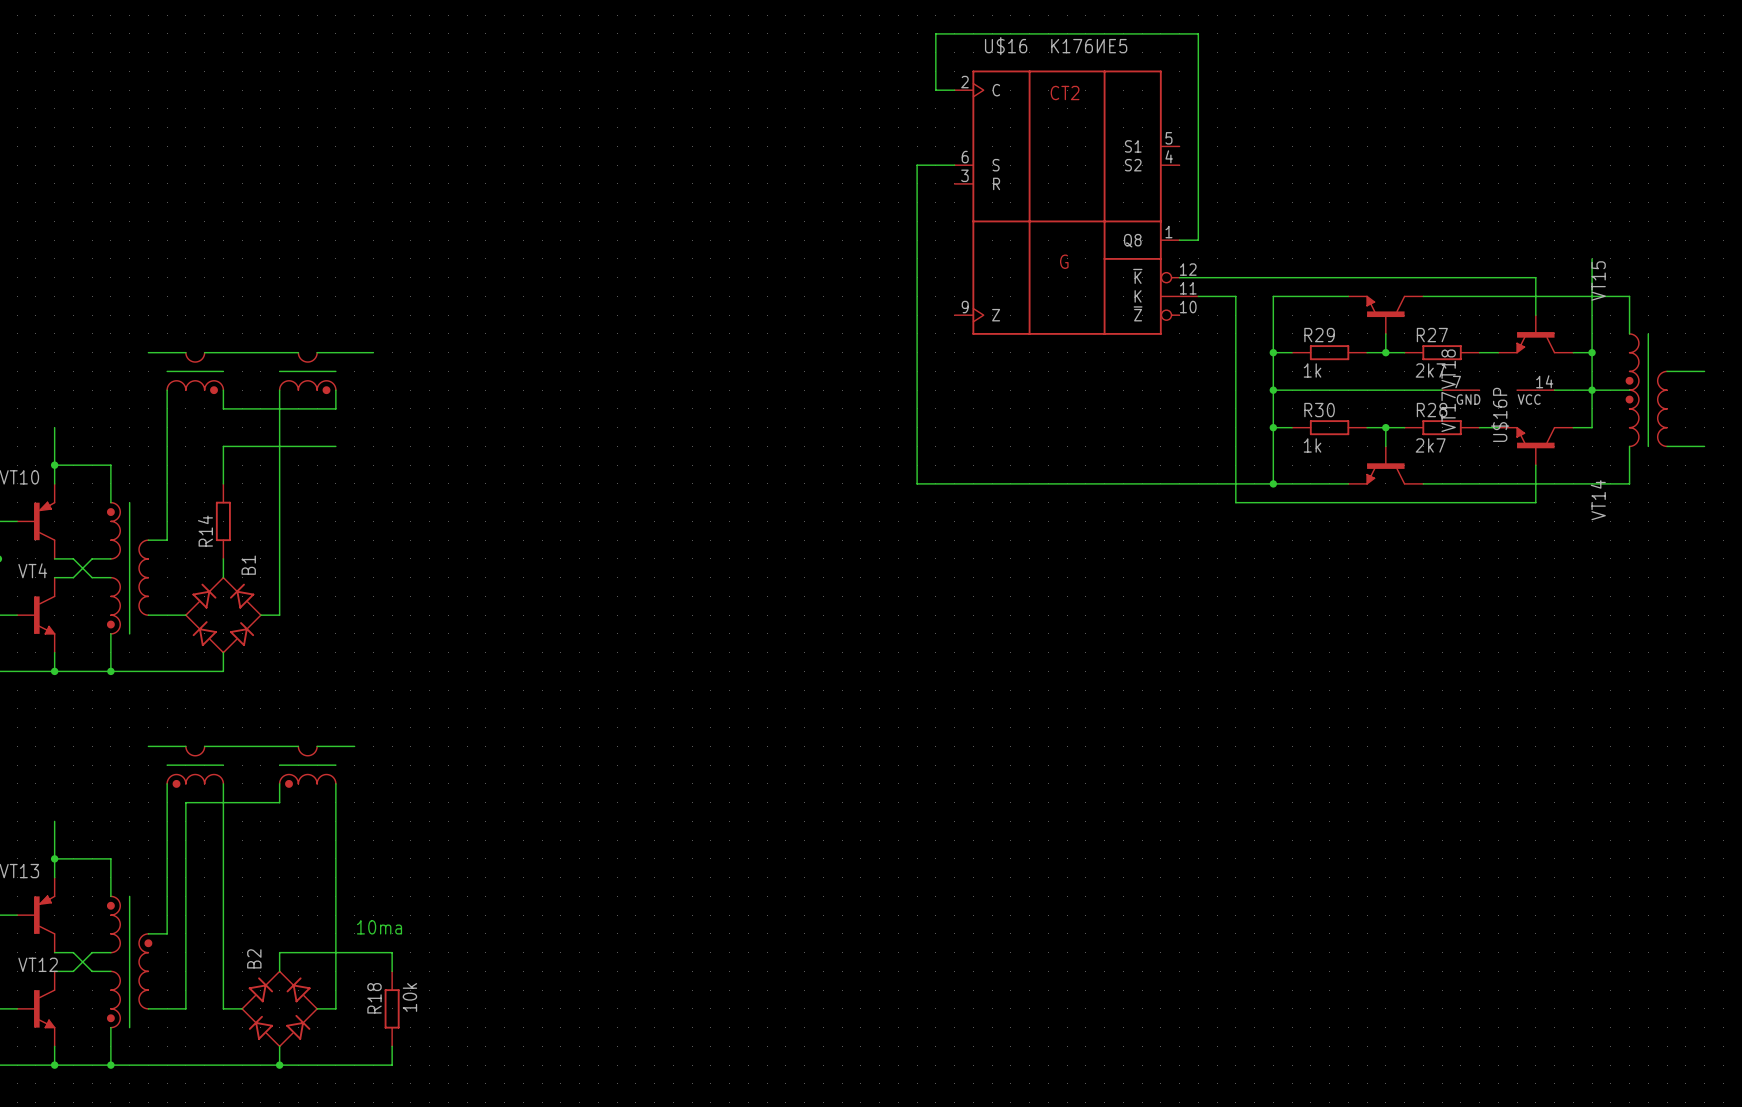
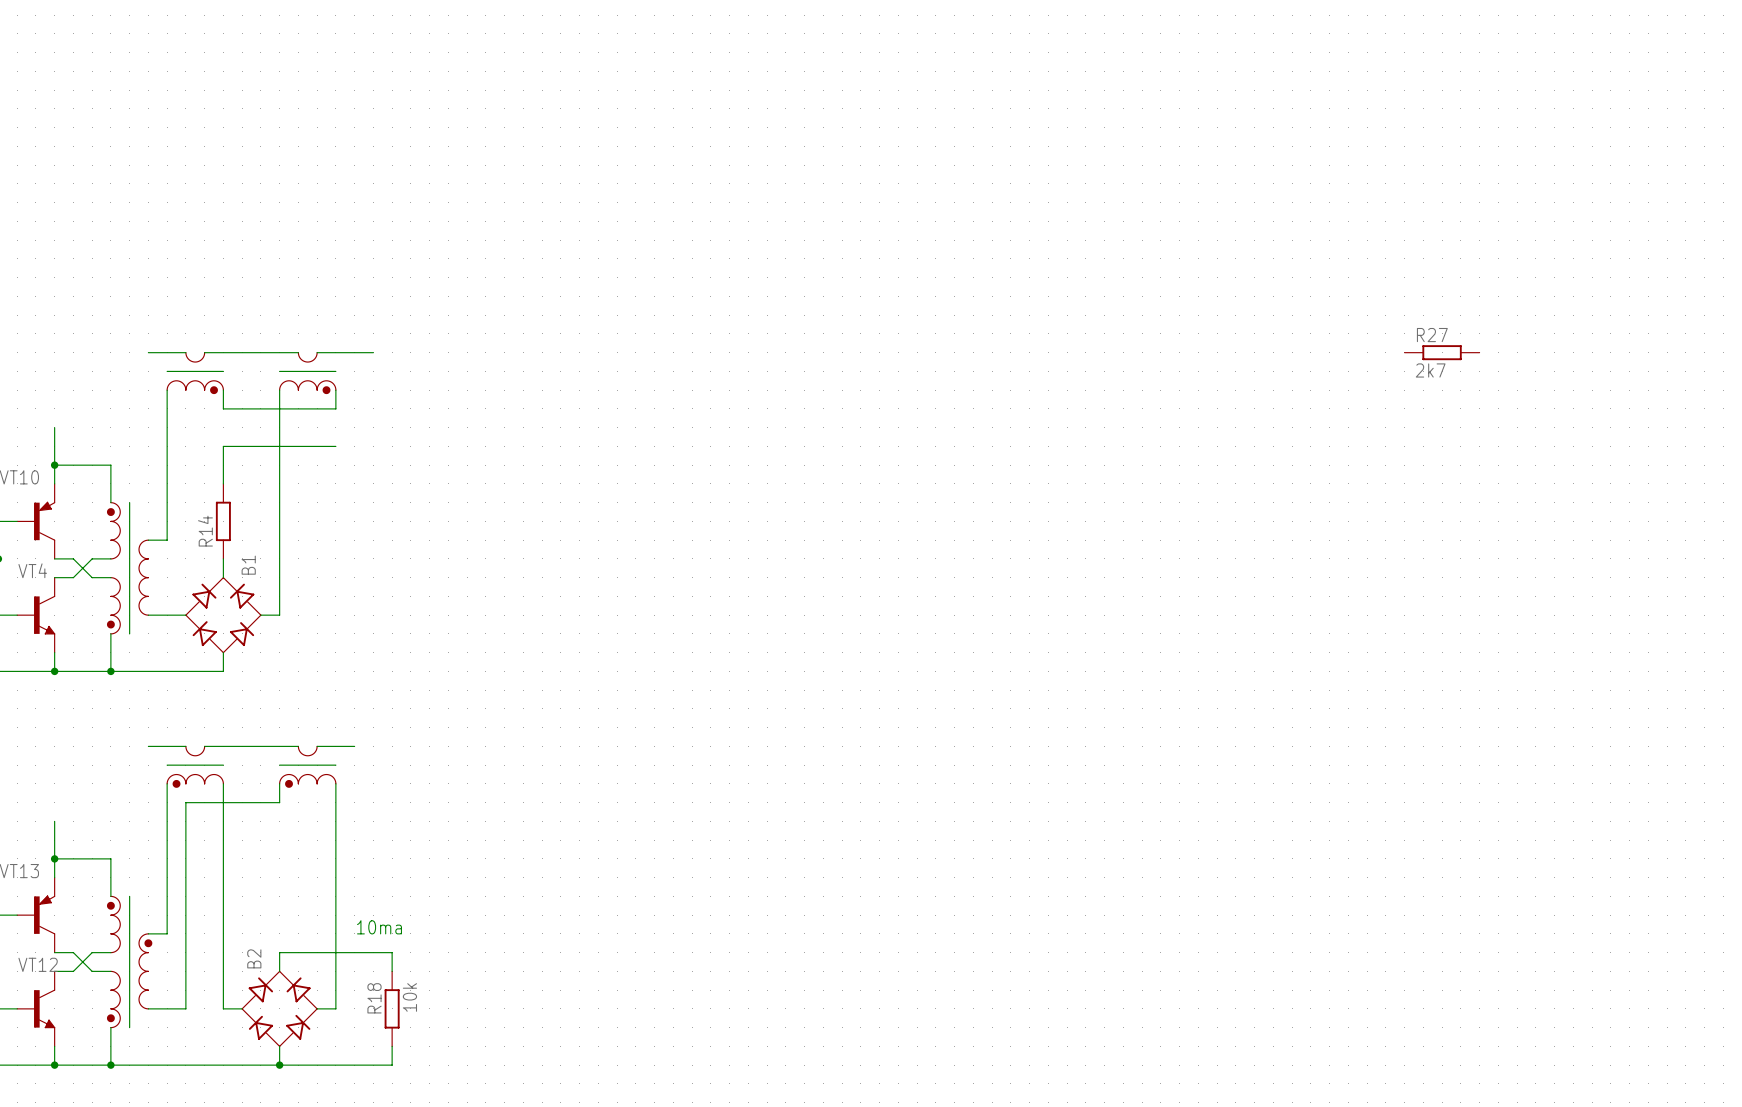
wire: (954, 90) (935, 90) (935, 33) (1198, 33) (1198, 240) (1179, 240) -> none
wire: (954, 165) (917, 165) (917, 483) (1348, 483) -> none
U$16: К176ИЕ5 (1076, 202) -> none
wire: (1592, 258) (1592, 427) (1573, 427) -> none
wire: (1179, 277) (1535, 277) (1535, 315) -> none
wire: (1198, 296) (1235, 296) (1235, 502) (1535, 502) (1535, 465) -> none
wire: (1348, 296) (1273, 296) (1273, 483) -> none
wire: (1423, 296) (1629, 296) (1629, 333) -> none
VT18: (1385, 314) -> none
wire: (1385, 333) (1385, 352) -> none
line: (1629, 333) (1636, 336) (1638, 343) (1636, 349) (1629, 352) (1635, 354) (1638, 360) (1636, 367) (1629, 371) (1635, 373) (1638, 379) (1636, 386) (1629, 390) (1635, 392) (1638, 398) (1636, 405) (1629, 408) (1635, 410) (1638, 415) (1636, 424) (1629, 427) (1636, 431) (1638, 438) (1635, 444) (1629, 446) -> none
wire: (1648, 333) (1648, 446) -> none
VT15: (1535, 334) -> none
wire: (1273, 352) (1292, 352) -> none
junction: (1273, 352) -> none
R29: 1k (1329, 352) -> none
wire: (1367, 352) (1404, 352) -> none
junction: (1385, 352) -> none
wire: (1479, 352) (1498, 352) -> none
wire: (1573, 352) (1592, 352) -> none
junction: (1592, 352) -> none
line: (1667, 371) (1660, 374) (1657, 380) (1660, 387) (1667, 390) (1661, 392) (1657, 398) (1659, 405) (1667, 408) (1661, 410) (1657, 415) (1659, 424) (1667, 427) (1659, 431) (1657, 438) (1661, 444) (1667, 446) -> none
wire: (1667, 371) (1704, 371) -> none
drawing: [1625, 376, 1634, 385] -> none
wire: (1273, 390) (1442, 390) -> none
junction: (1273, 390) -> none
U$16P: (1498, 390) -> none
wire: (1554, 390) (1629, 390) -> none
junction: (1592, 390) -> none
drawing: [1625, 395, 1634, 404] -> none
wire: (1273, 427) (1292, 427) -> none
junction: (1273, 427) -> none
R30: 1k (1329, 427) -> none
wire: (1367, 427) (1404, 427) -> none
wire: (1385, 427) (1385, 446) -> none
junction: (1385, 427) -> none
R28: 2k7 (1442, 427) -> none
wire: (1479, 427) (1498, 427) -> none
VT14: (1535, 446) -> none
wire: (1629, 446) (1629, 483) (1423, 483) -> none
wire: (1667, 446) (1704, 446) -> none
VT17: (1385, 465) -> none
junction: (1273, 483) -> none

